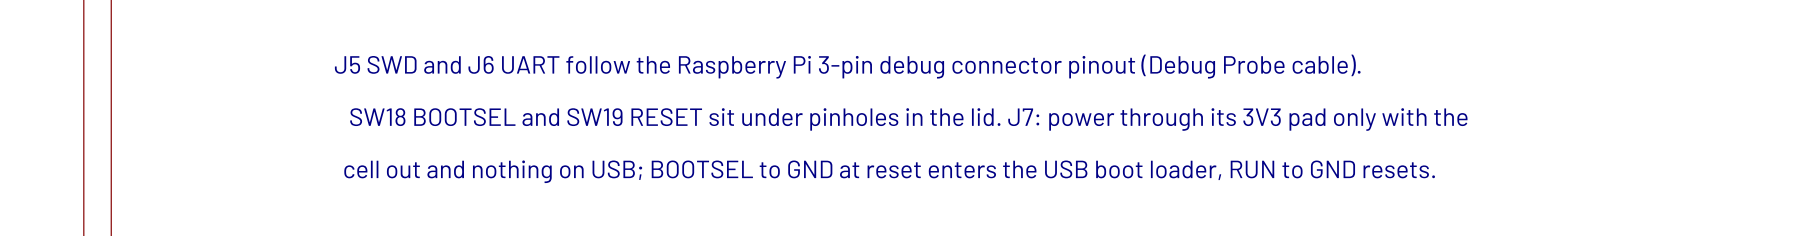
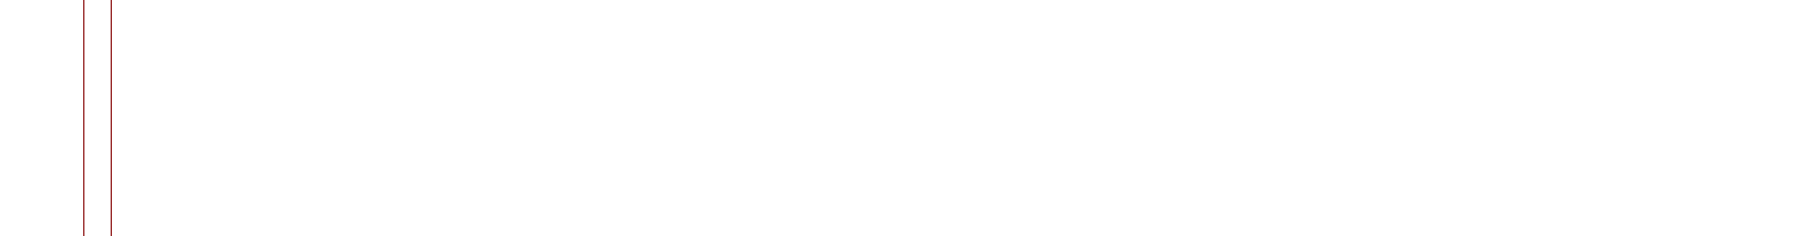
text: J5 SWD and J6 UART follow the Raspberry Pi 3-pin debug connector pinout (Debug Probe cable). (847, 66) -> none
text: SW18 BOOTSEL and SW19 RESET sit under pinholes in the lid. J7: power through its 3V3 pad only with the (908, 119) -> none
text: cell out and nothing on USB; BOOTSEL to GND at reset enters the USB boot loader, RUN to GND resets. (889, 171) -> none

